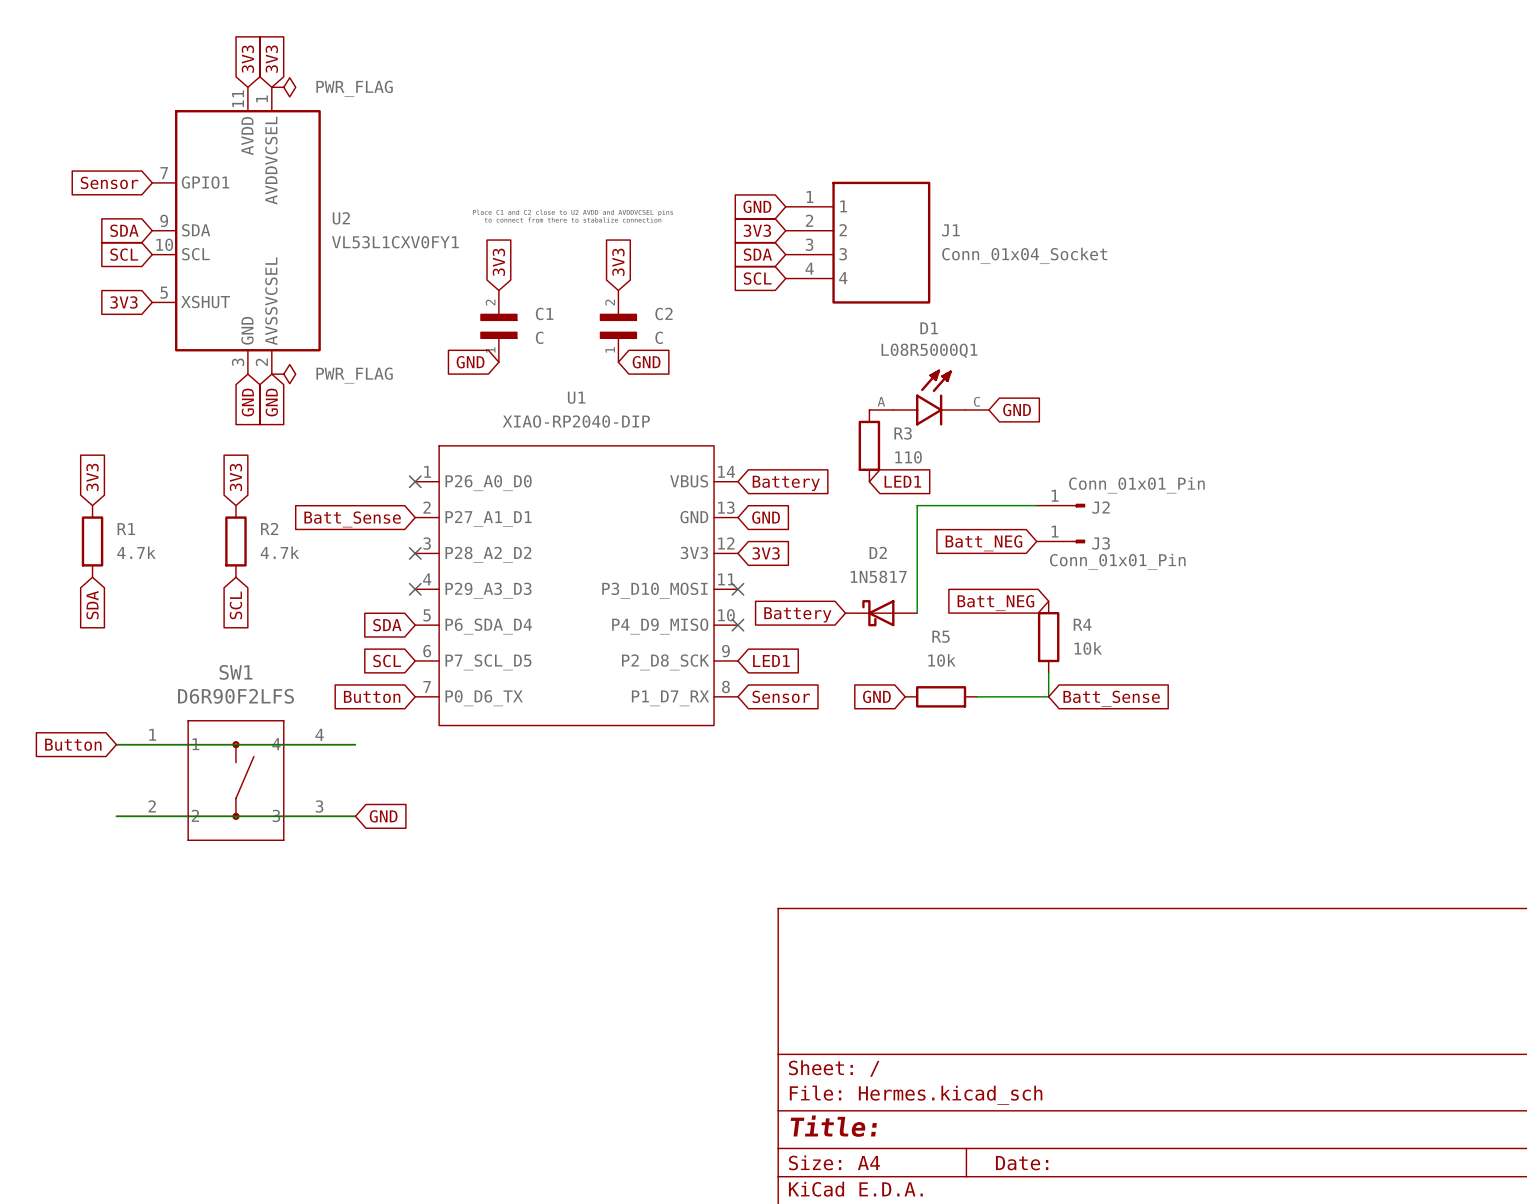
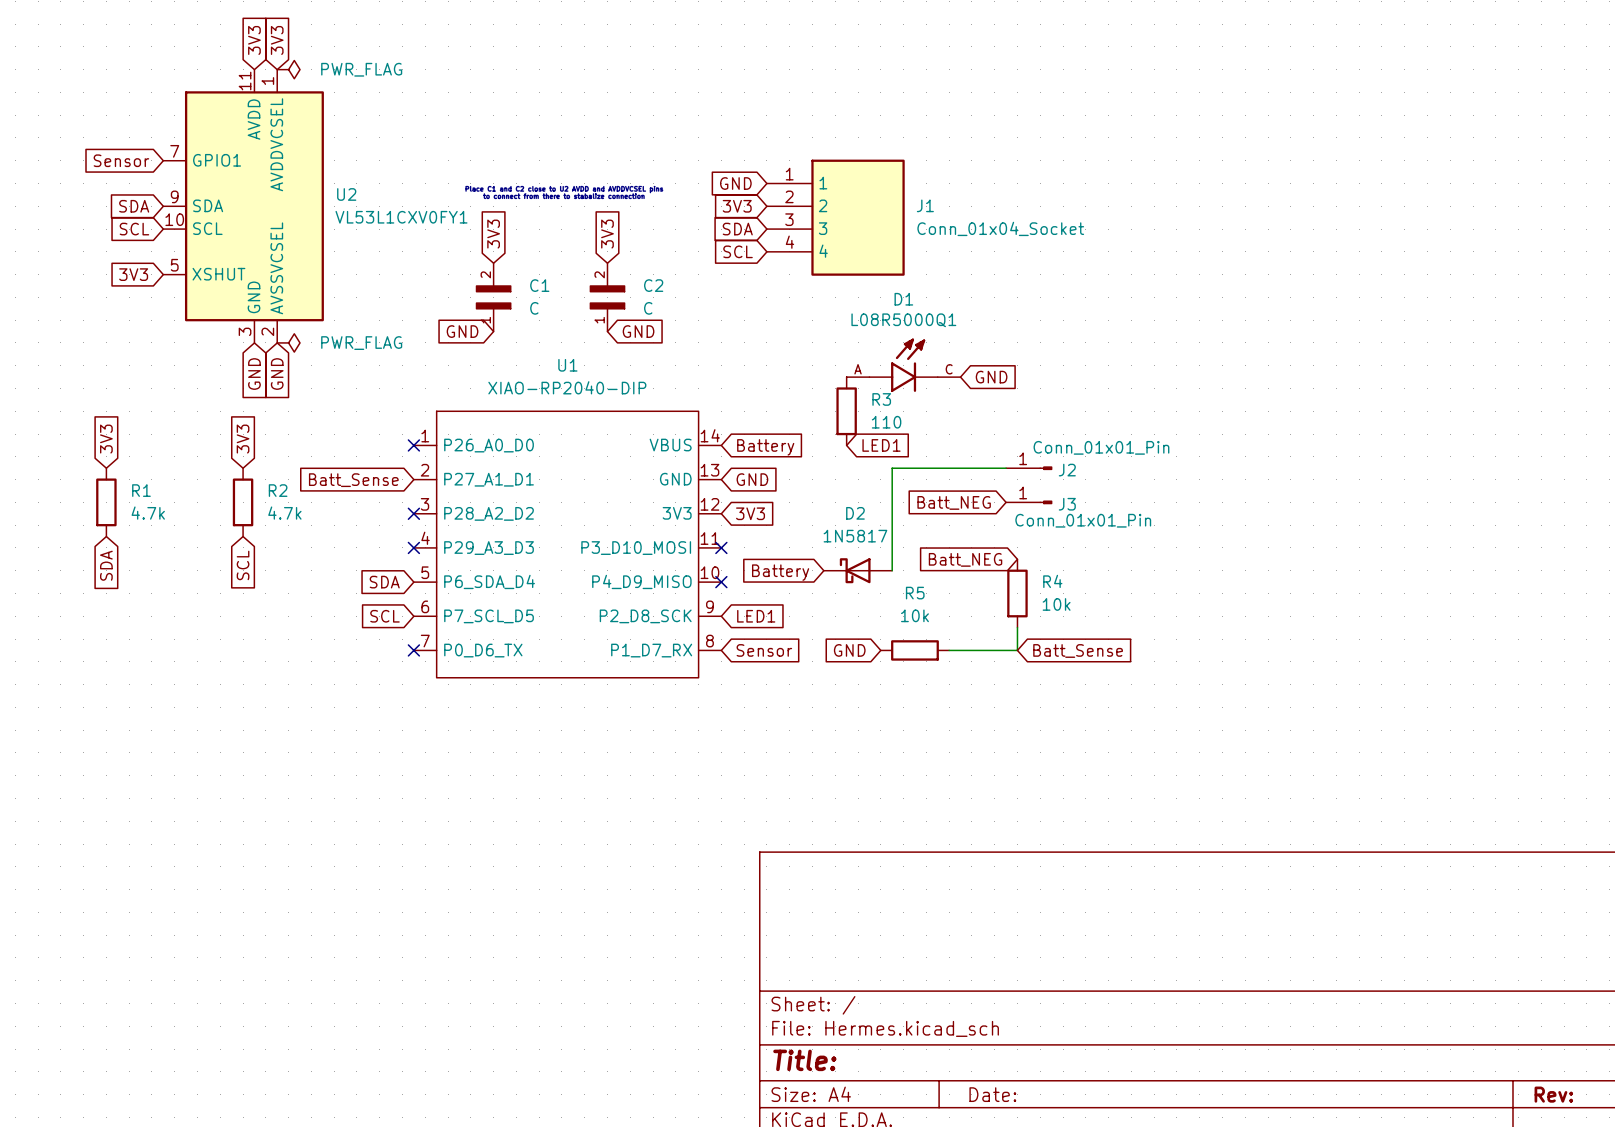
global label: Button (372, 696) -> none
no-connect mark: none -> (413, 650)
global label: Button (73, 744) -> none
wire: (116, 744) (355, 744) -> none
SW1: D6R90F2LFS (235, 780) -> none
wire: (116, 816) (355, 816) -> none
global label: GND (383, 816) -> none

